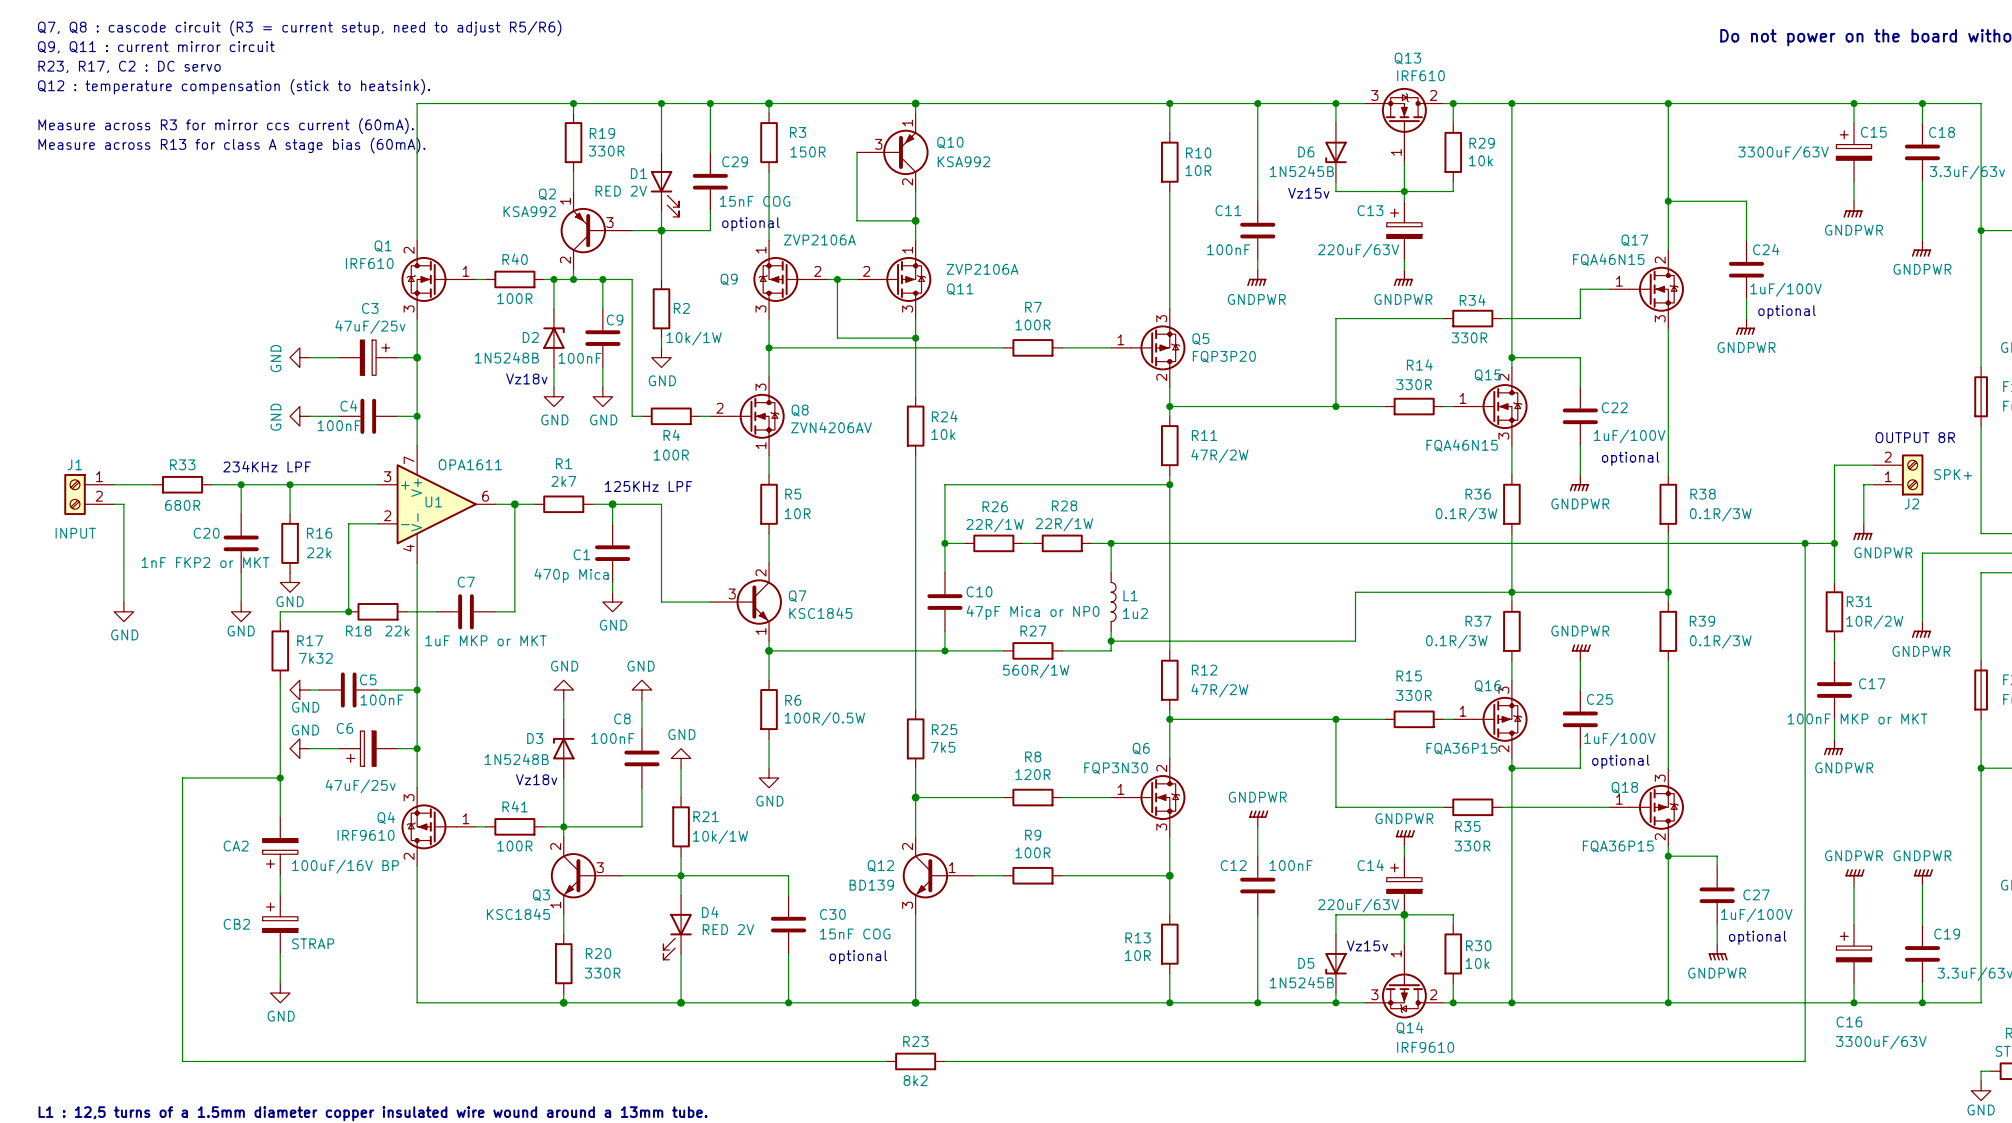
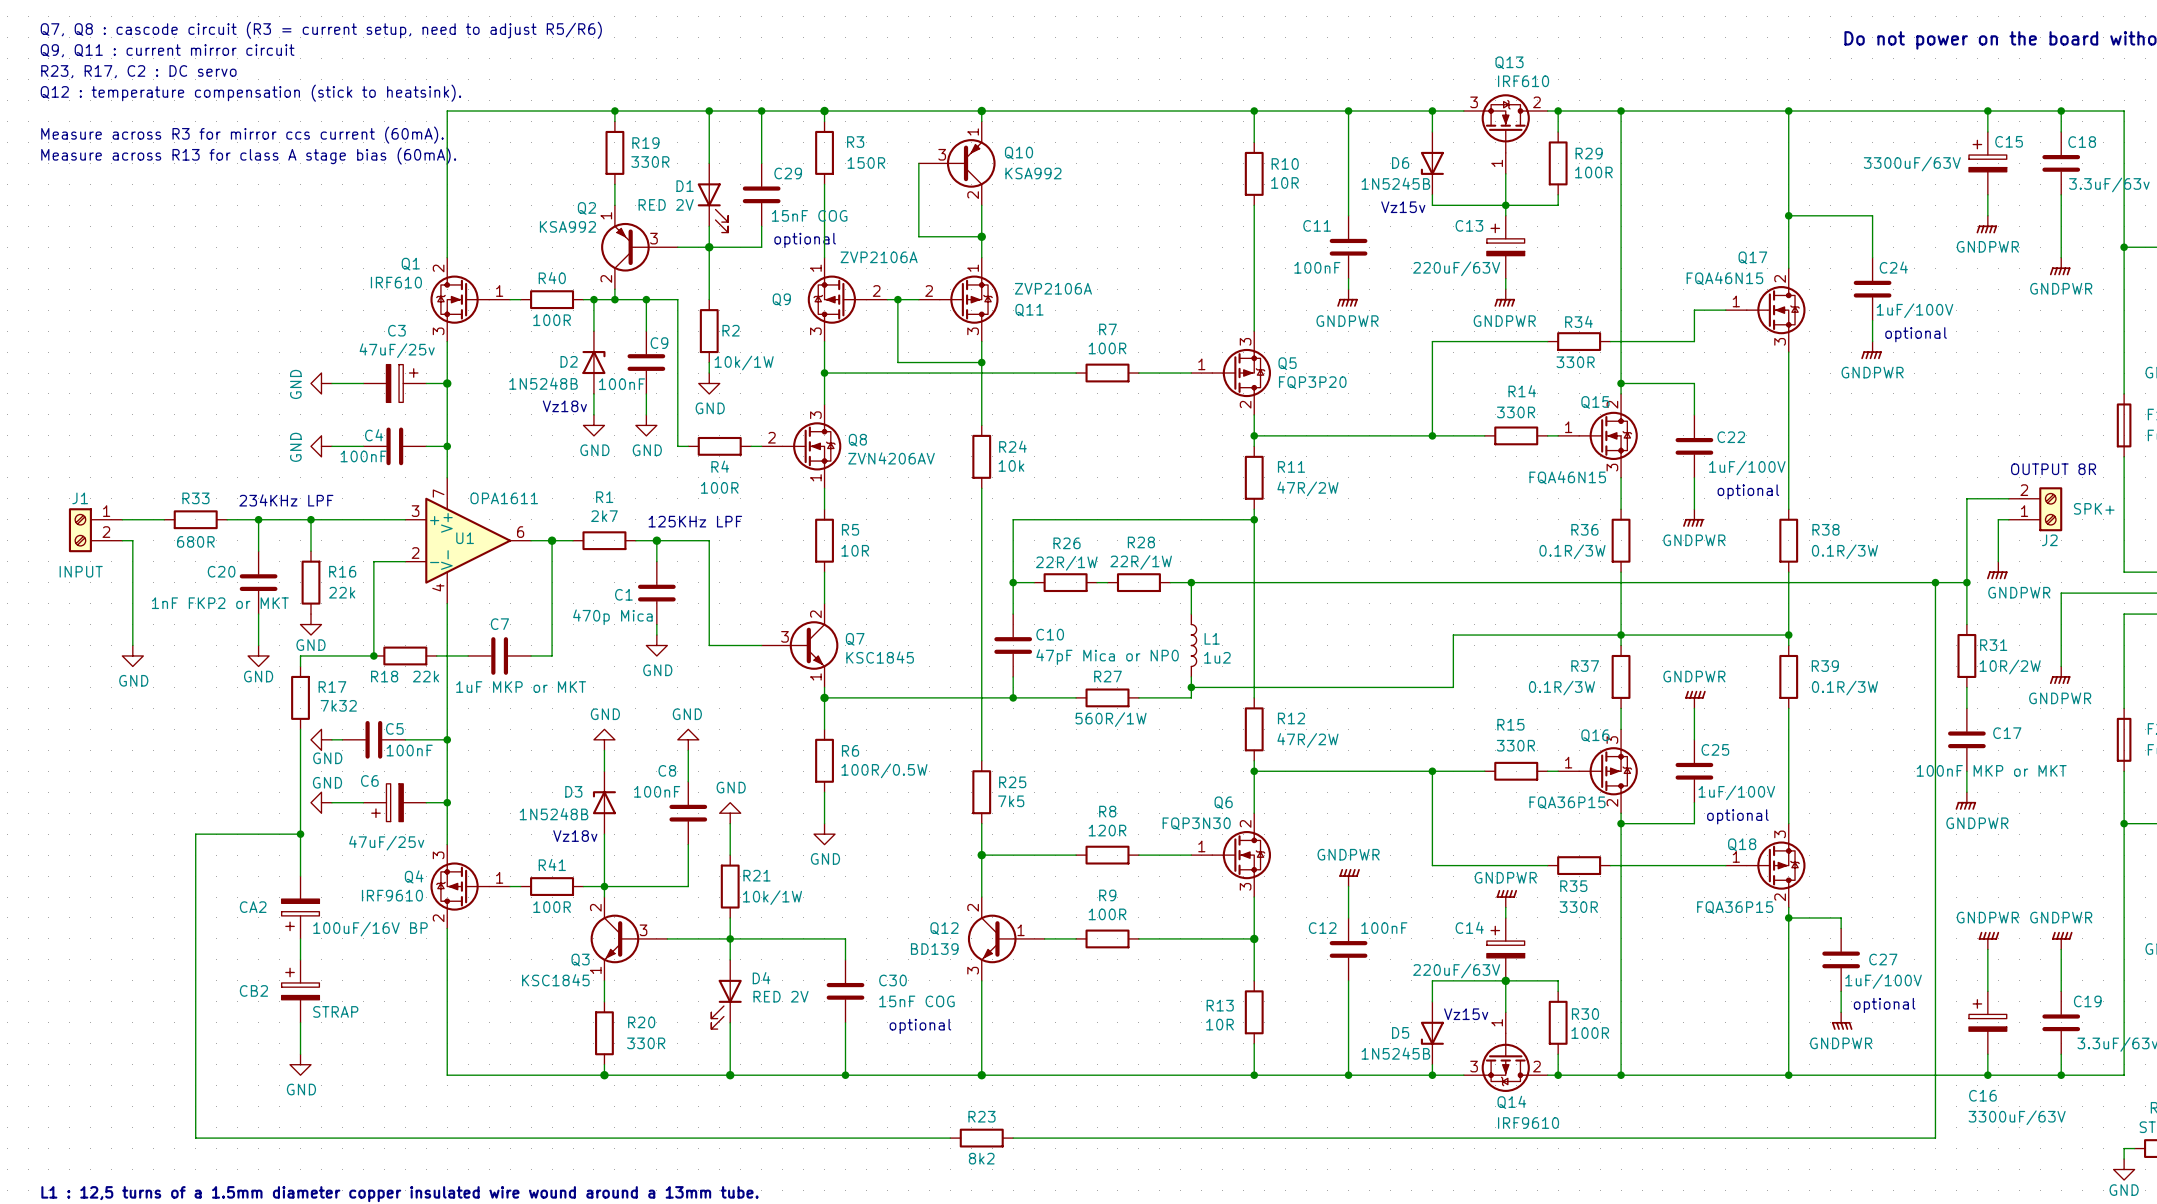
R29 value: 10k (1480, 160) -> 100R (1593, 172)
R30 value: 10k (1477, 963) -> 100R (1590, 1033)

